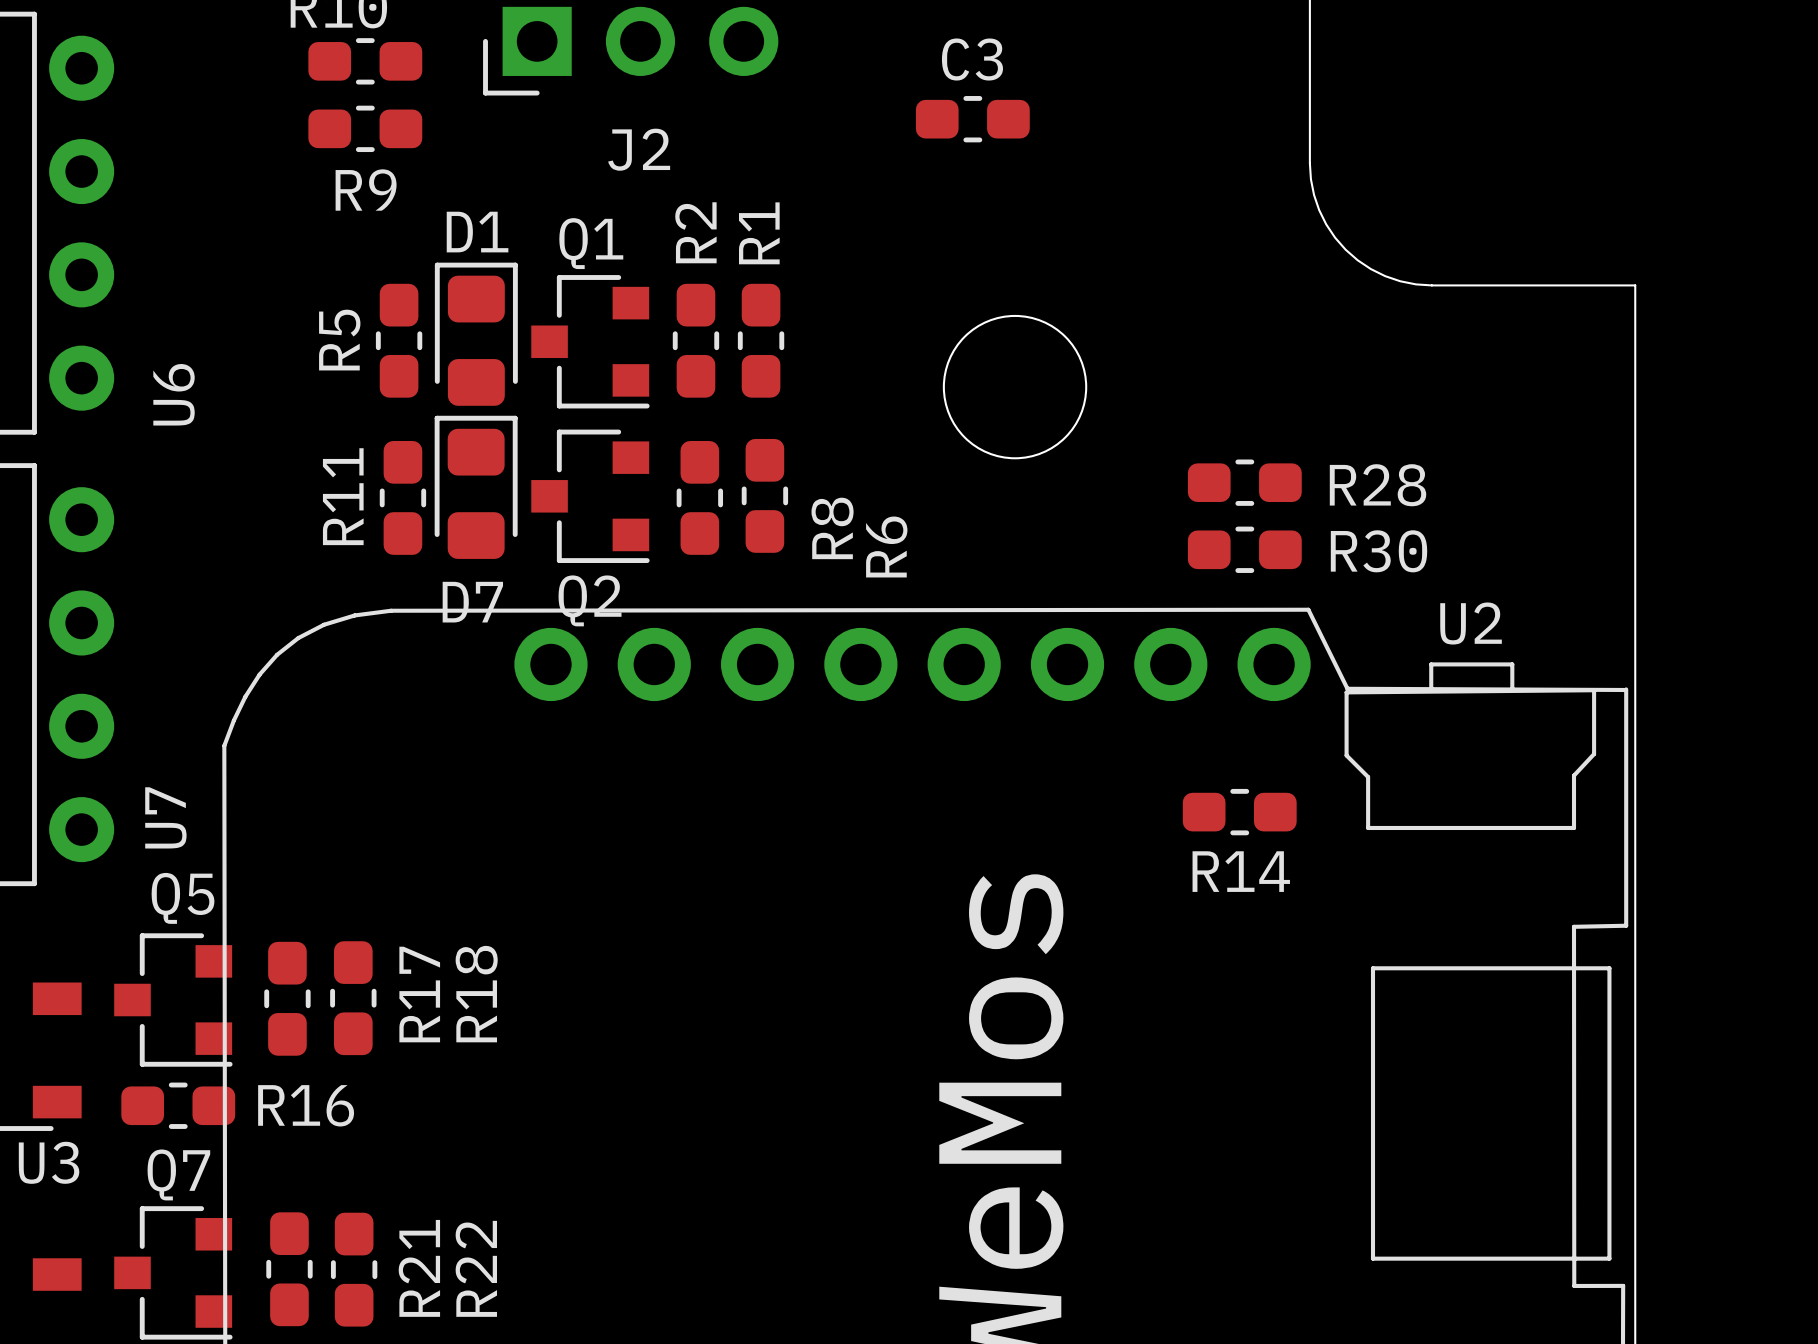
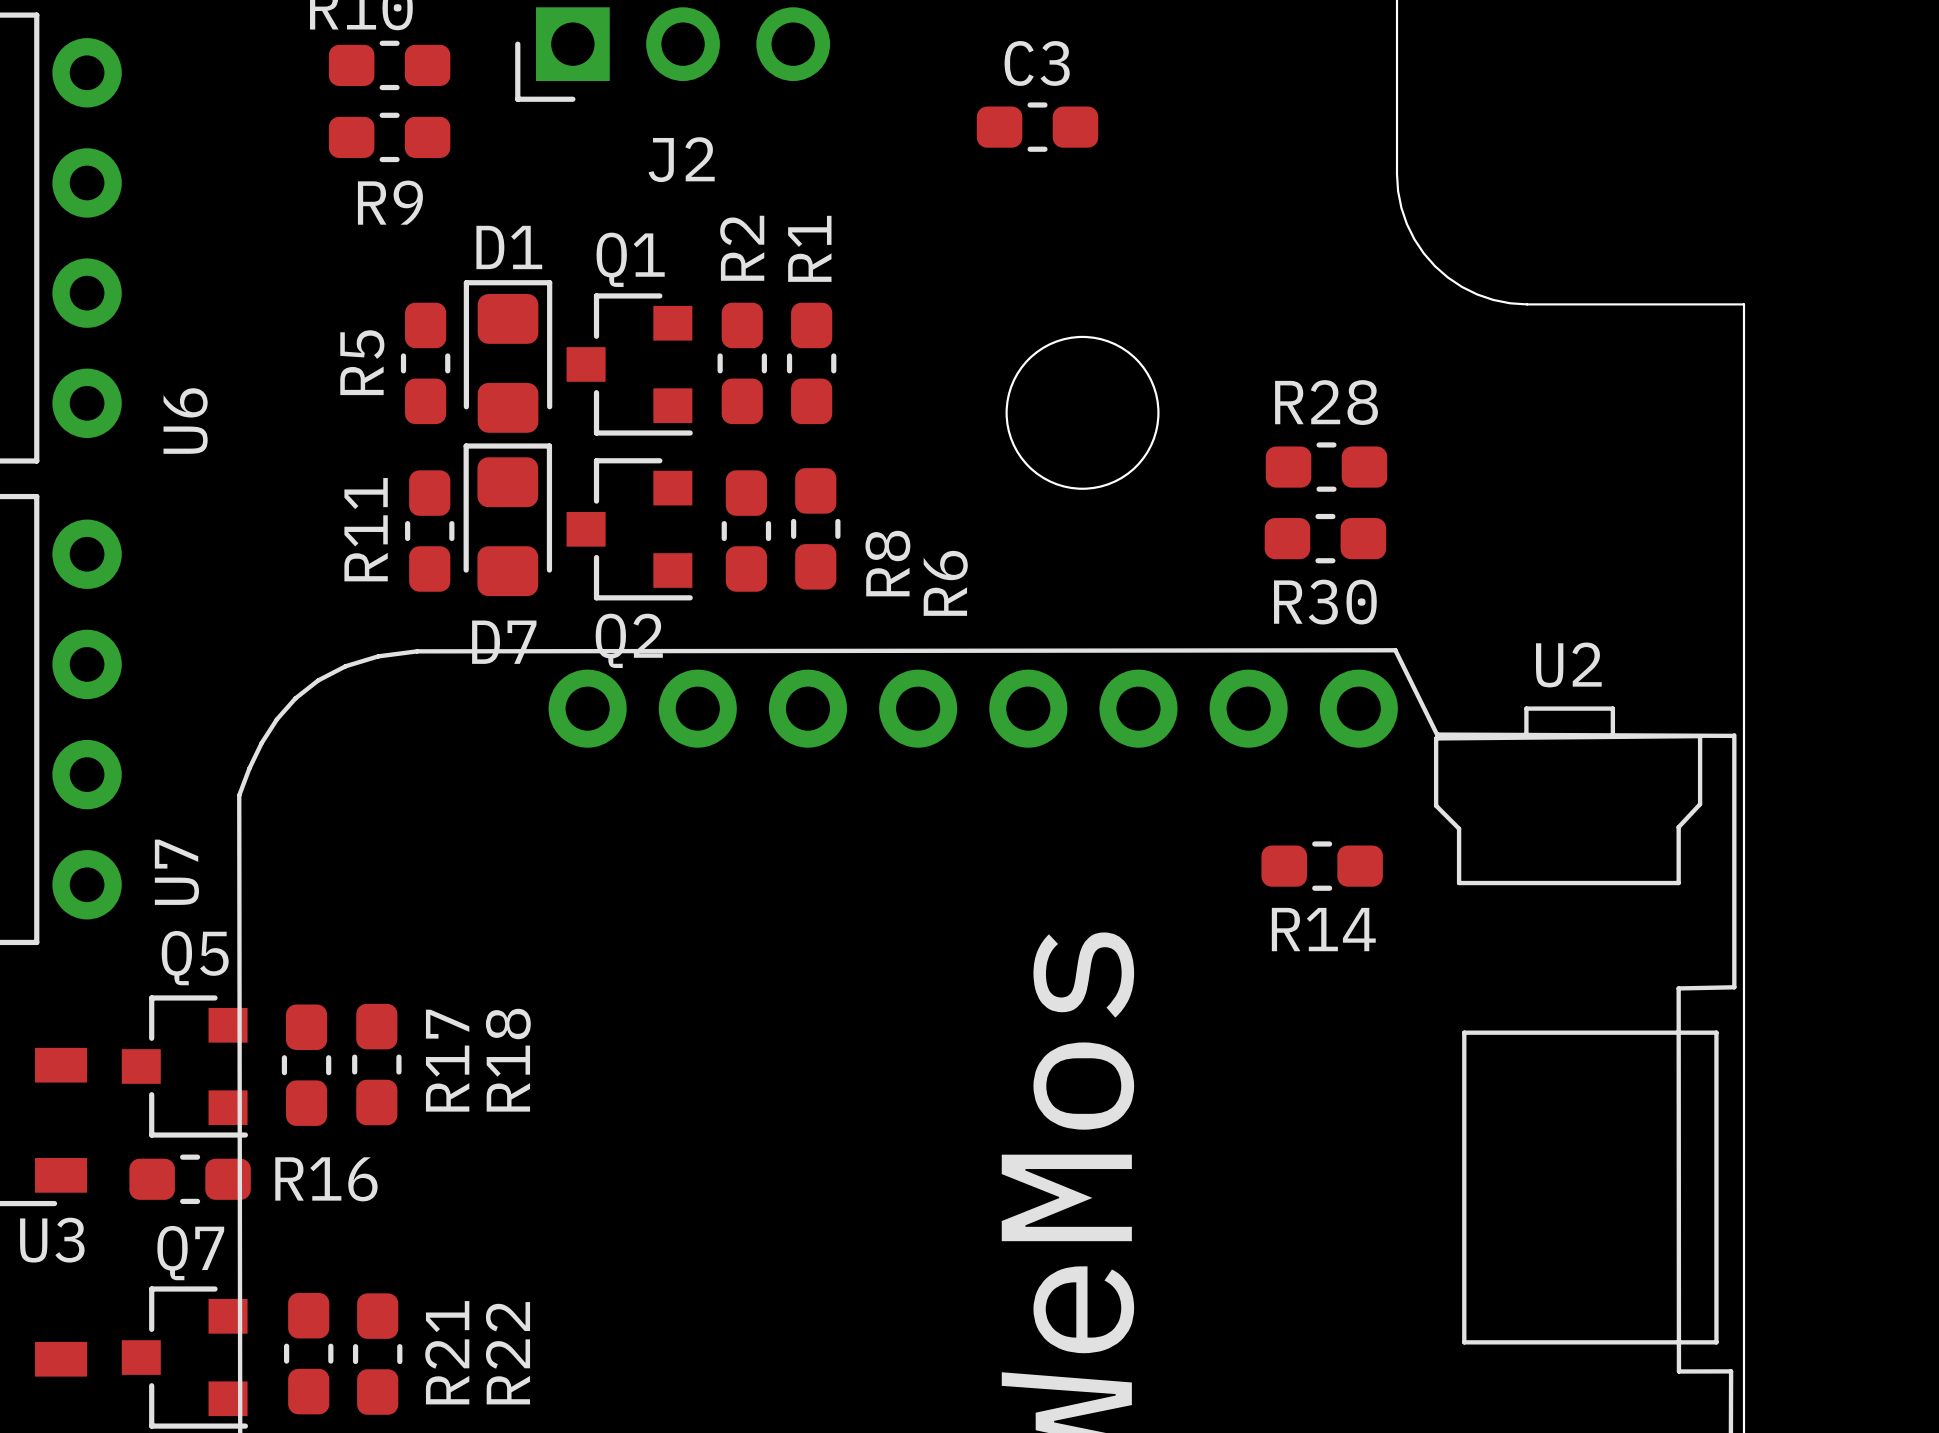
R28 position: (1244, 482) -> (1326, 467)
R28 name position: R28 (1378, 485) -> R28 (1326, 402)
R30 position: (1244, 549) -> (1325, 538)
R30 name position: R30 (1379, 551) -> R30 (1325, 602)

